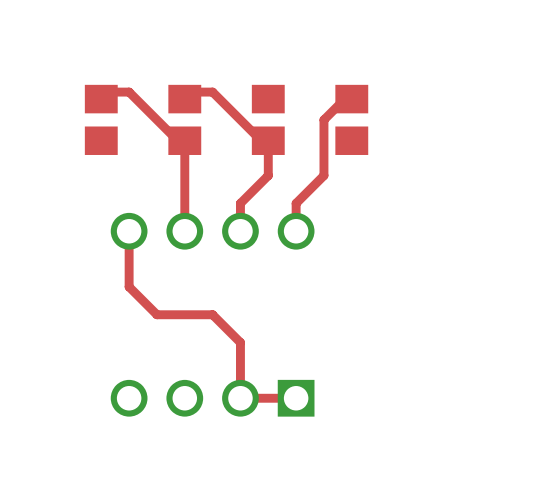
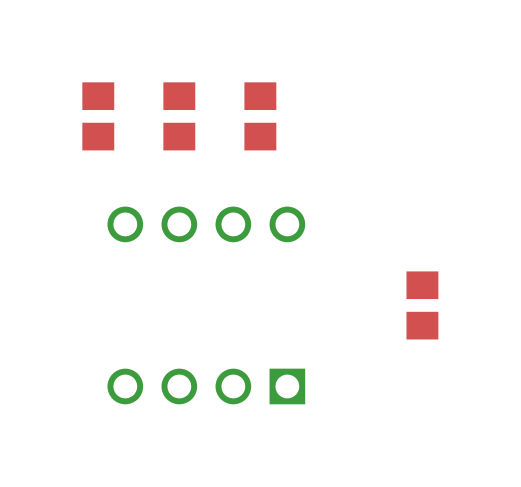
top track: (101, 99) (108, 92) (129, 92) (177, 140) (184, 140) (184, 231) -> none
top track: (184, 99) (191, 92) (212, 92) (261, 140) (268, 140) (268, 175) (240, 203) (240, 231) -> none
top track: (351, 99) (351, 92) (323, 119) (323, 175) (296, 203) (296, 231) -> none
part position: (351, 119) -> (422, 305)
top track: (129, 231) (129, 286) (156, 314) (212, 314) (240, 342) (240, 398) (296, 398) -> none

